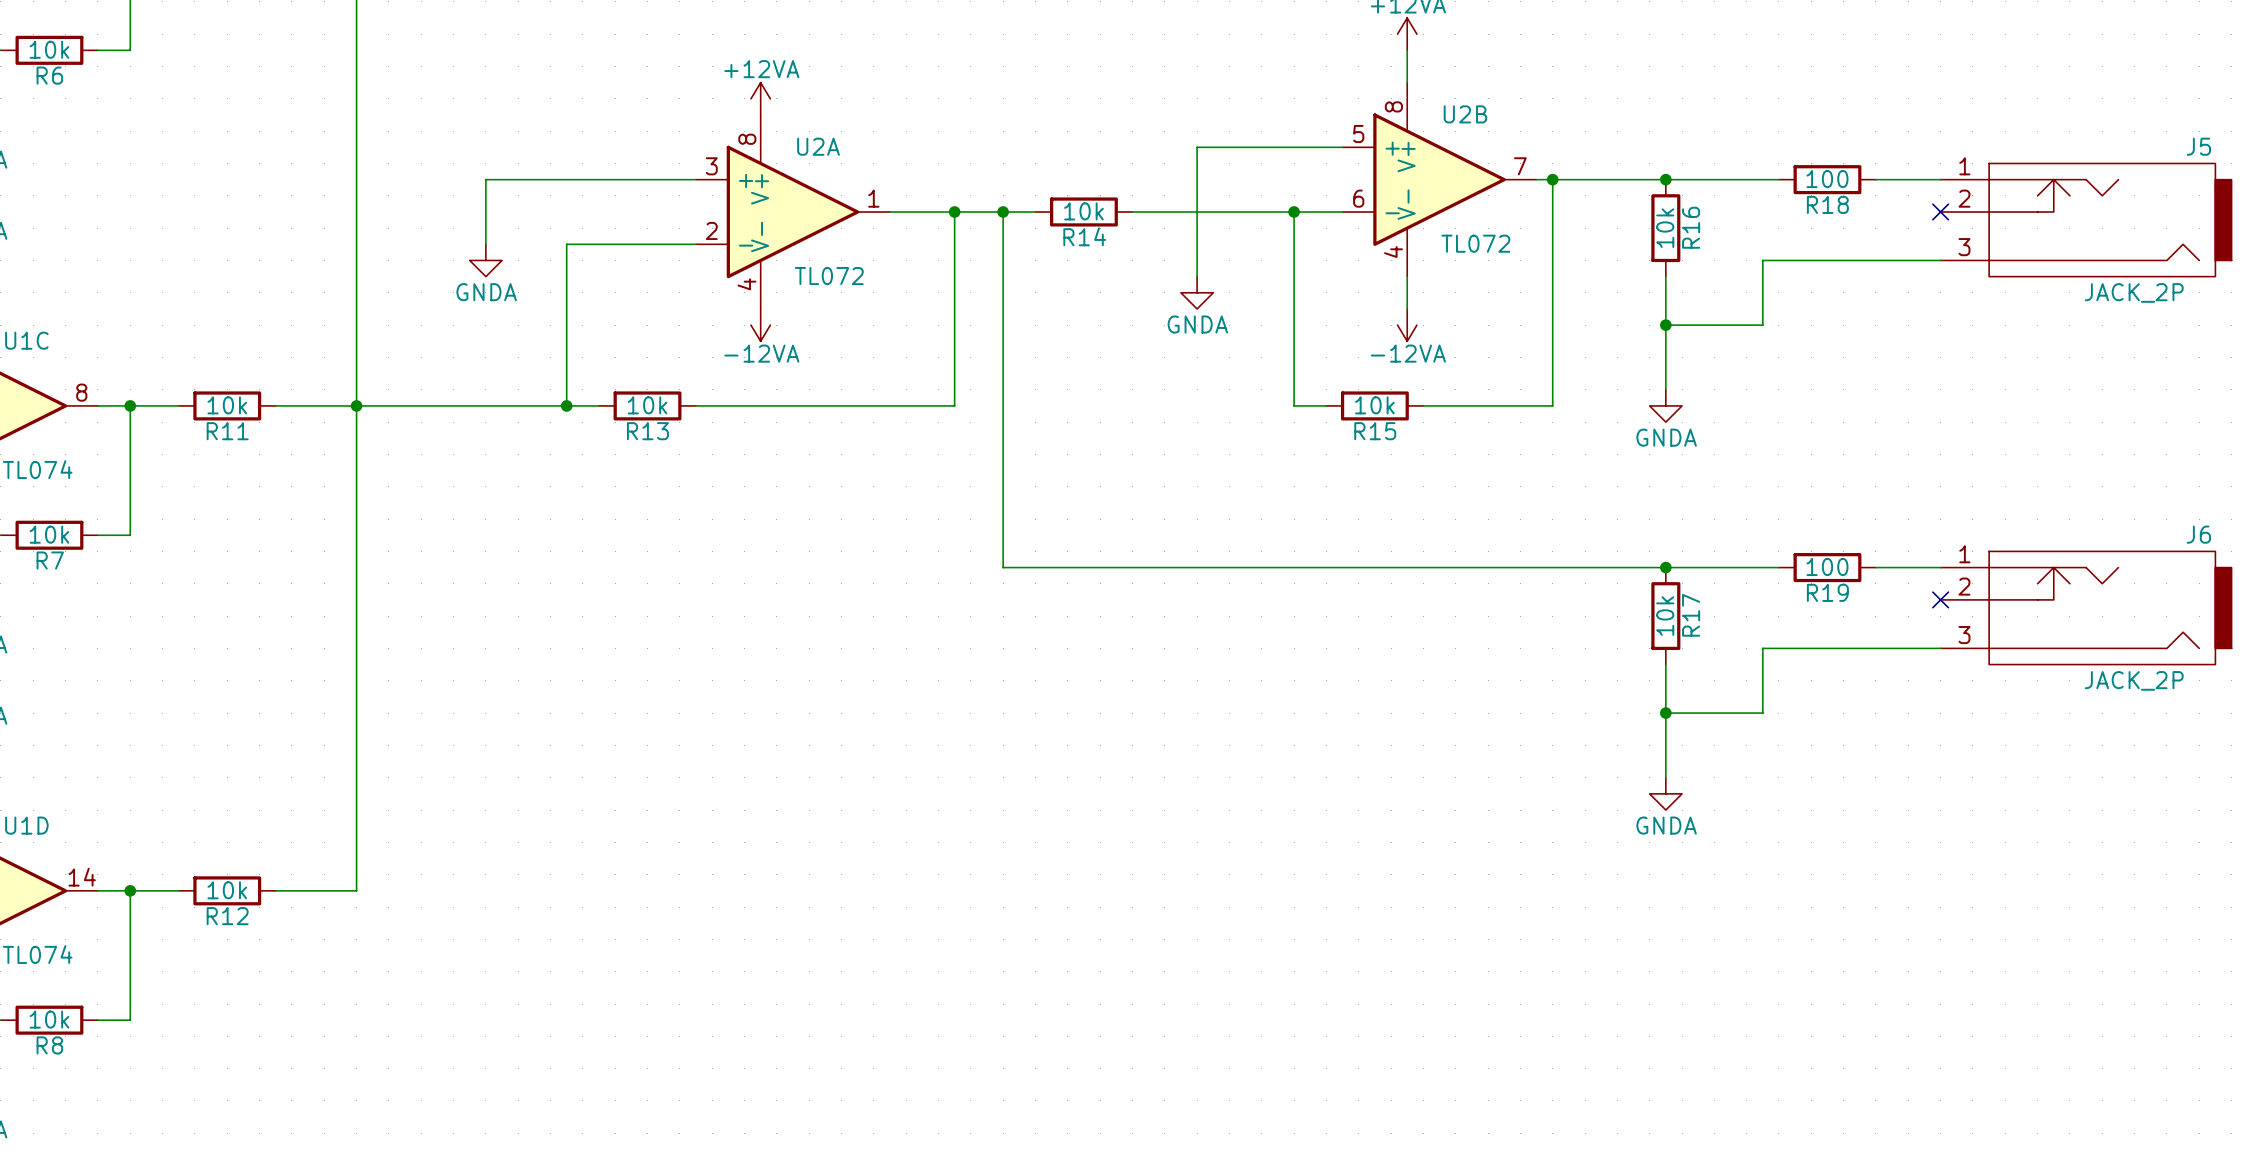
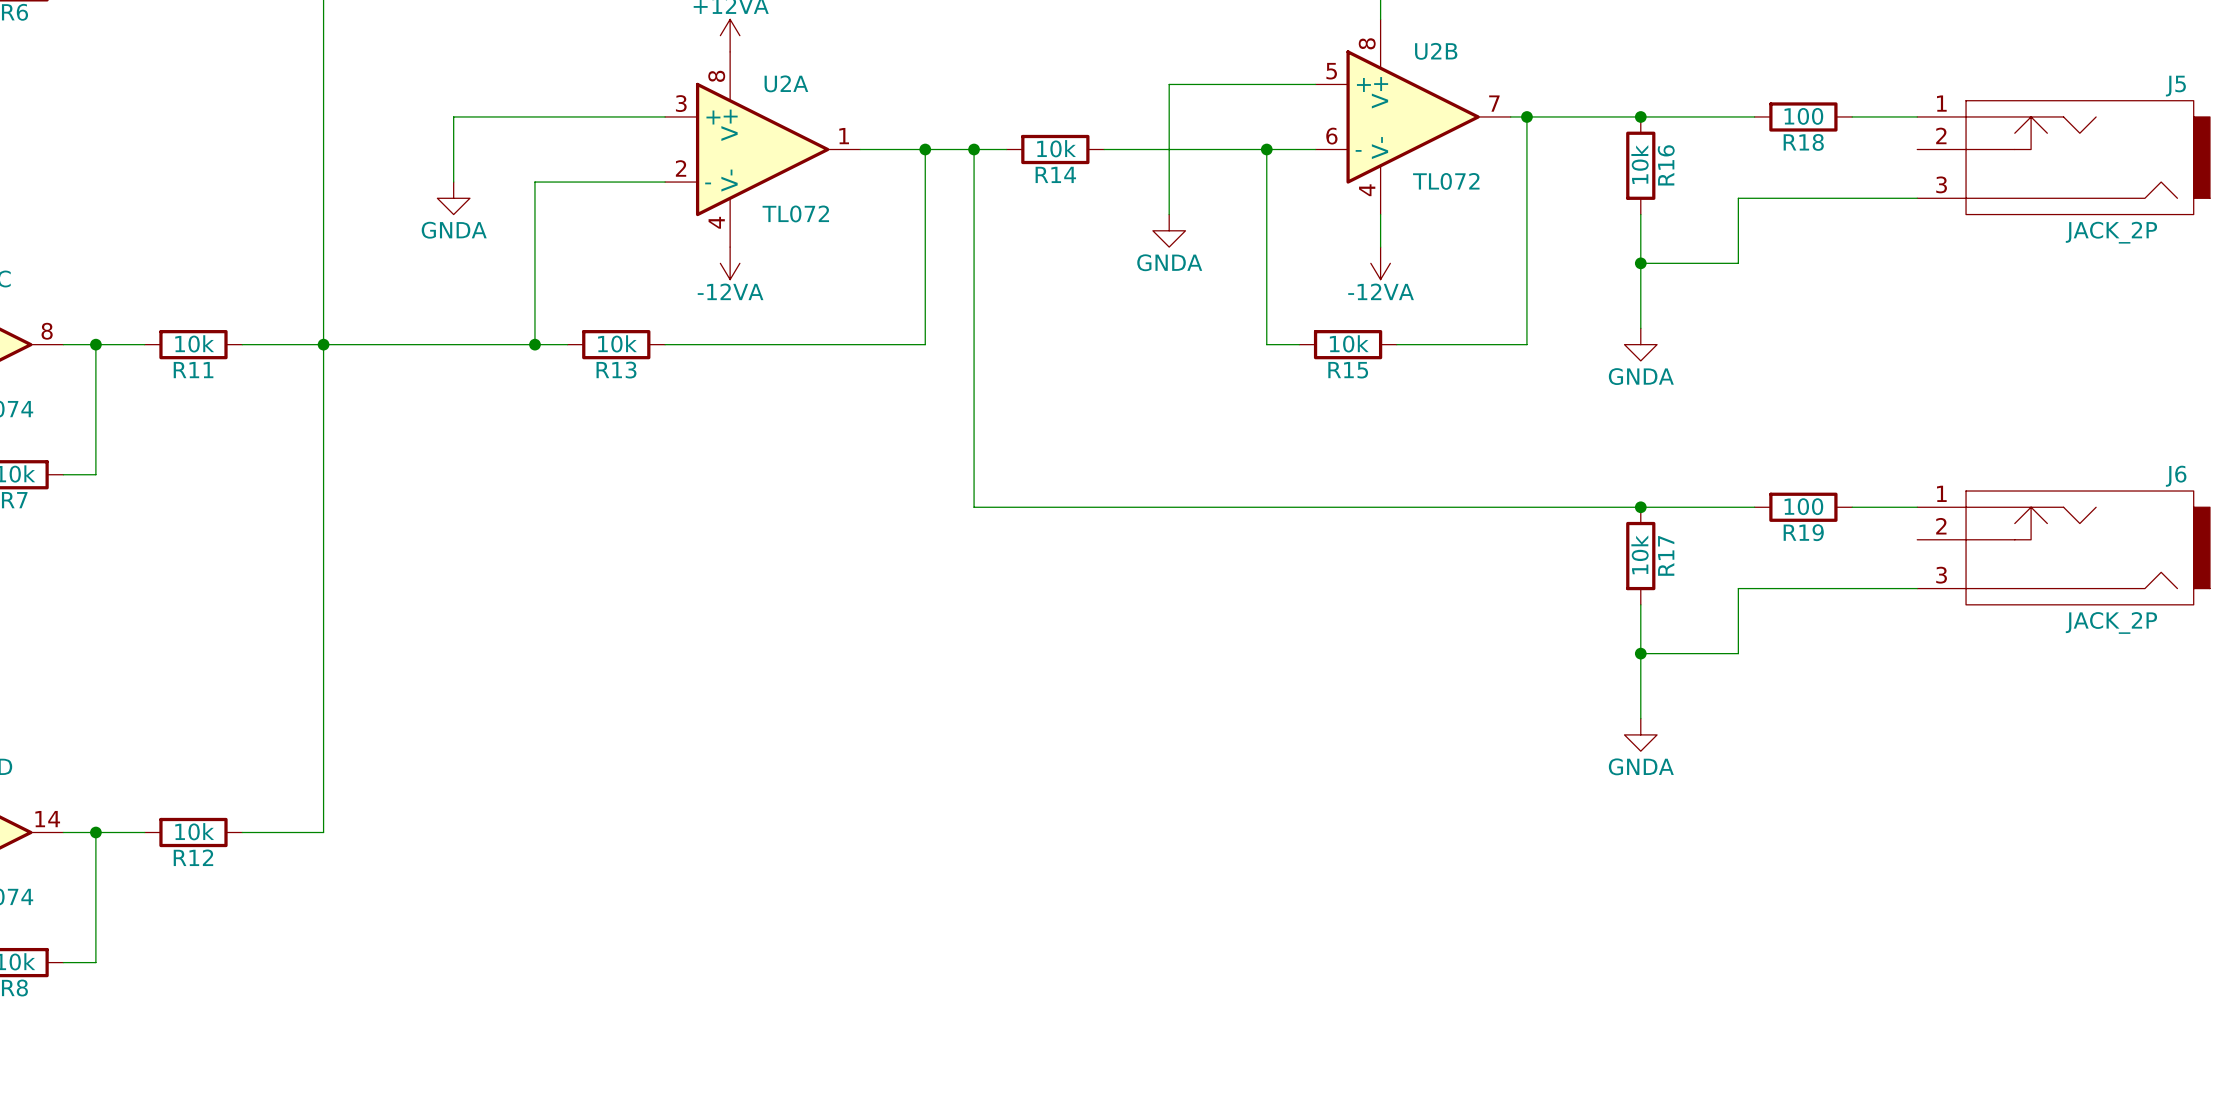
no-connect mark: (1940, 211) -> none
no-connect mark: (1940, 599) -> none

